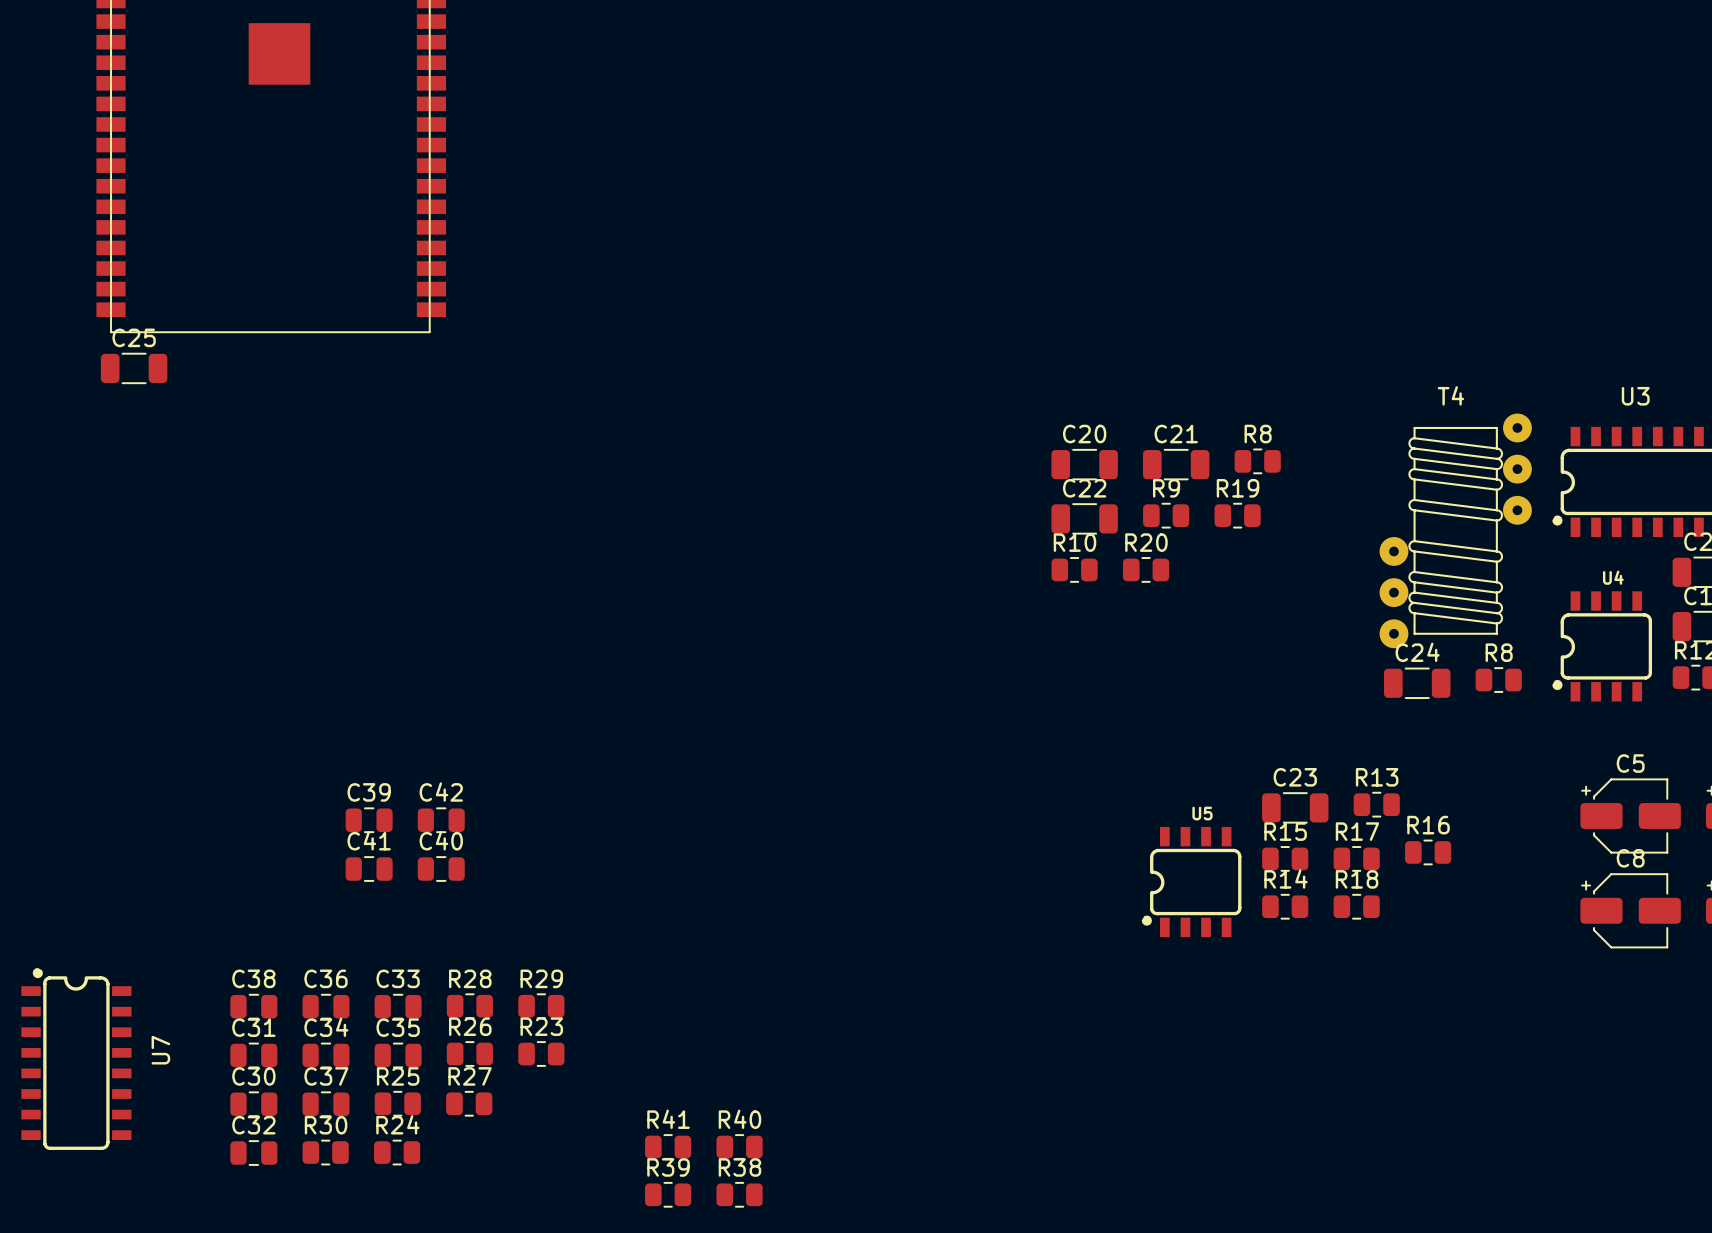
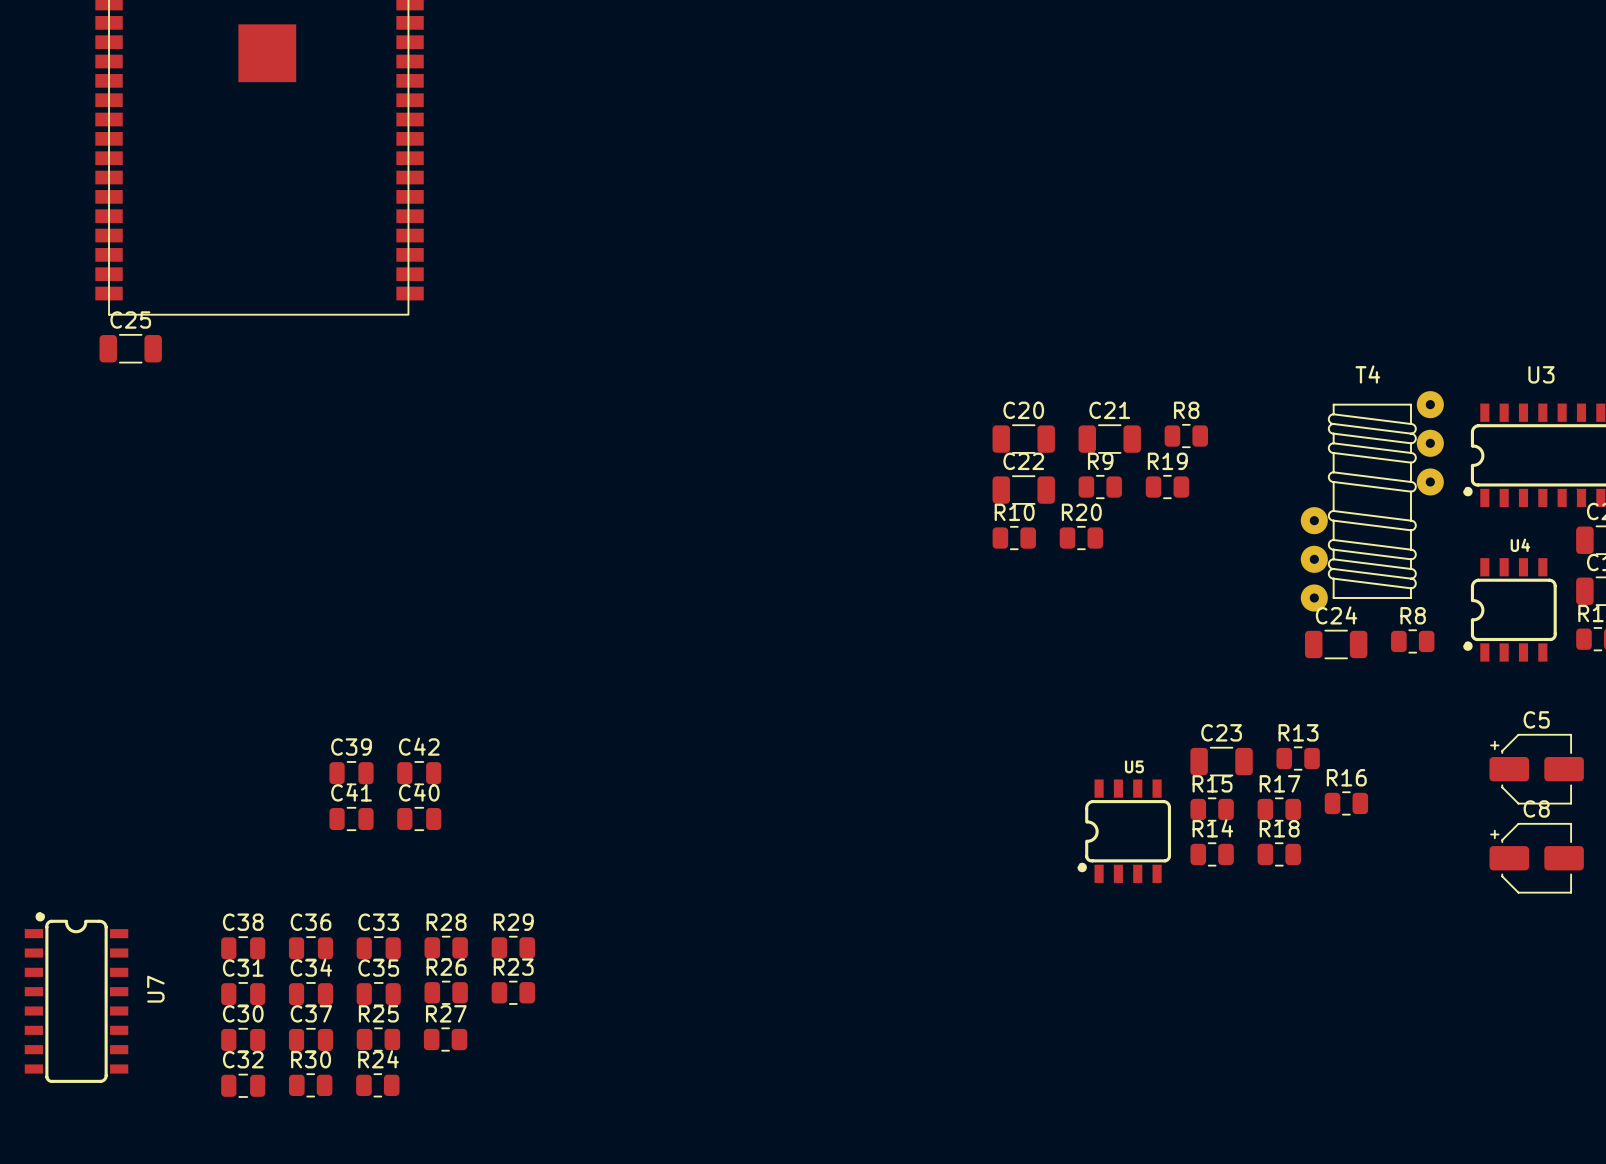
R41: (668, 1146) -> none
R40: (739, 1146) -> none
R39: (668, 1194) -> none
R38: (739, 1194) -> none

